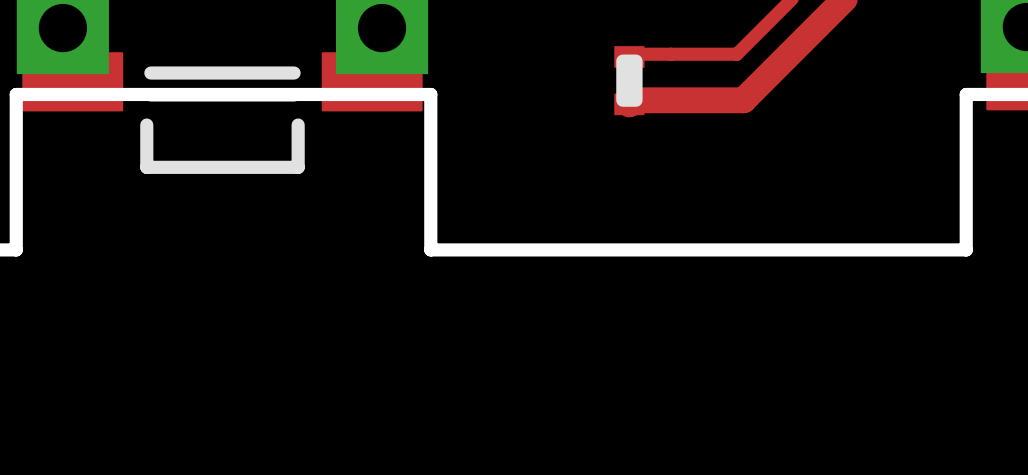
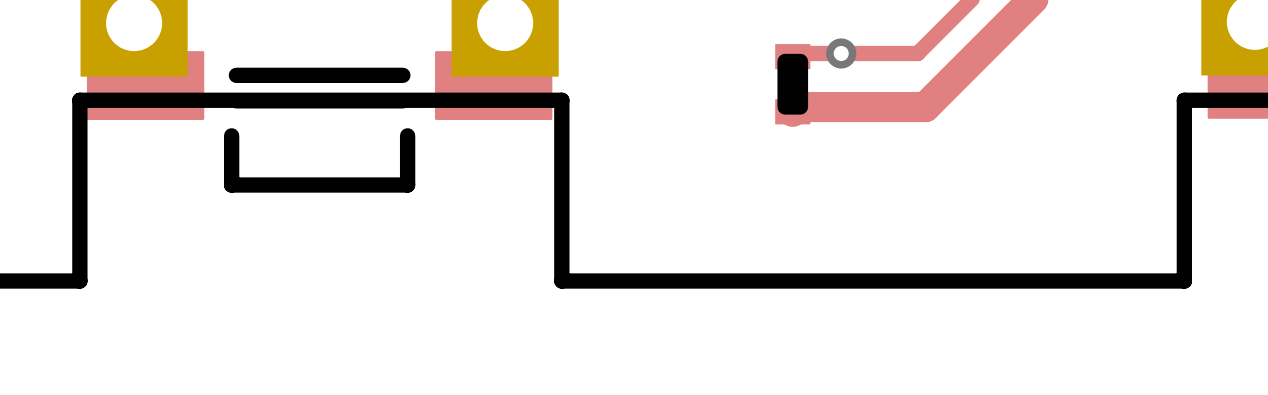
via: none -> (841, 53)

